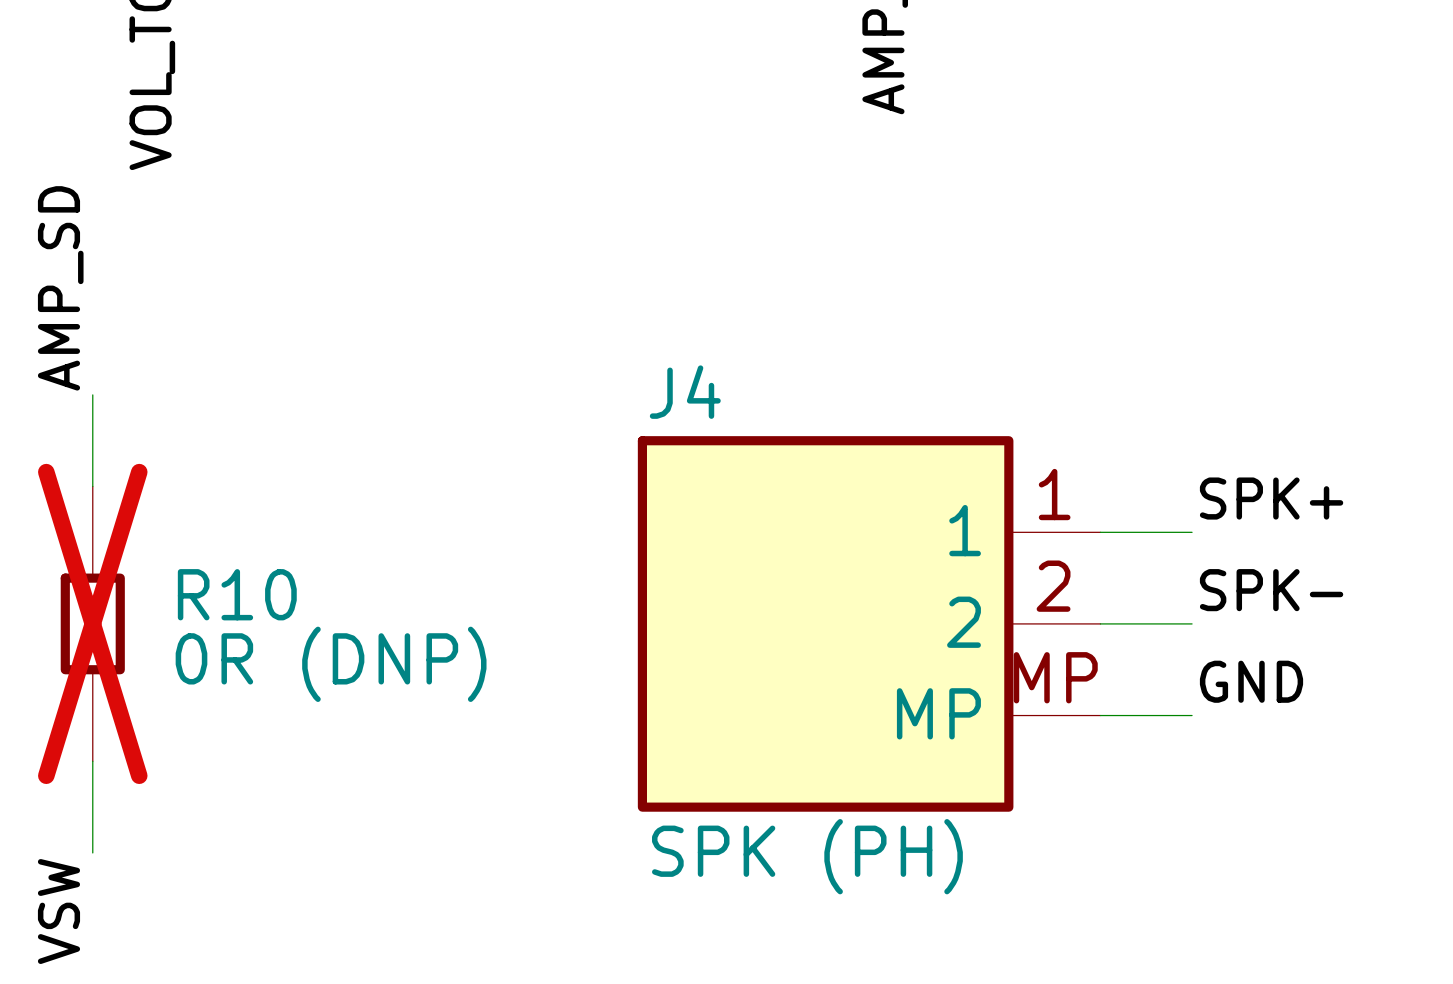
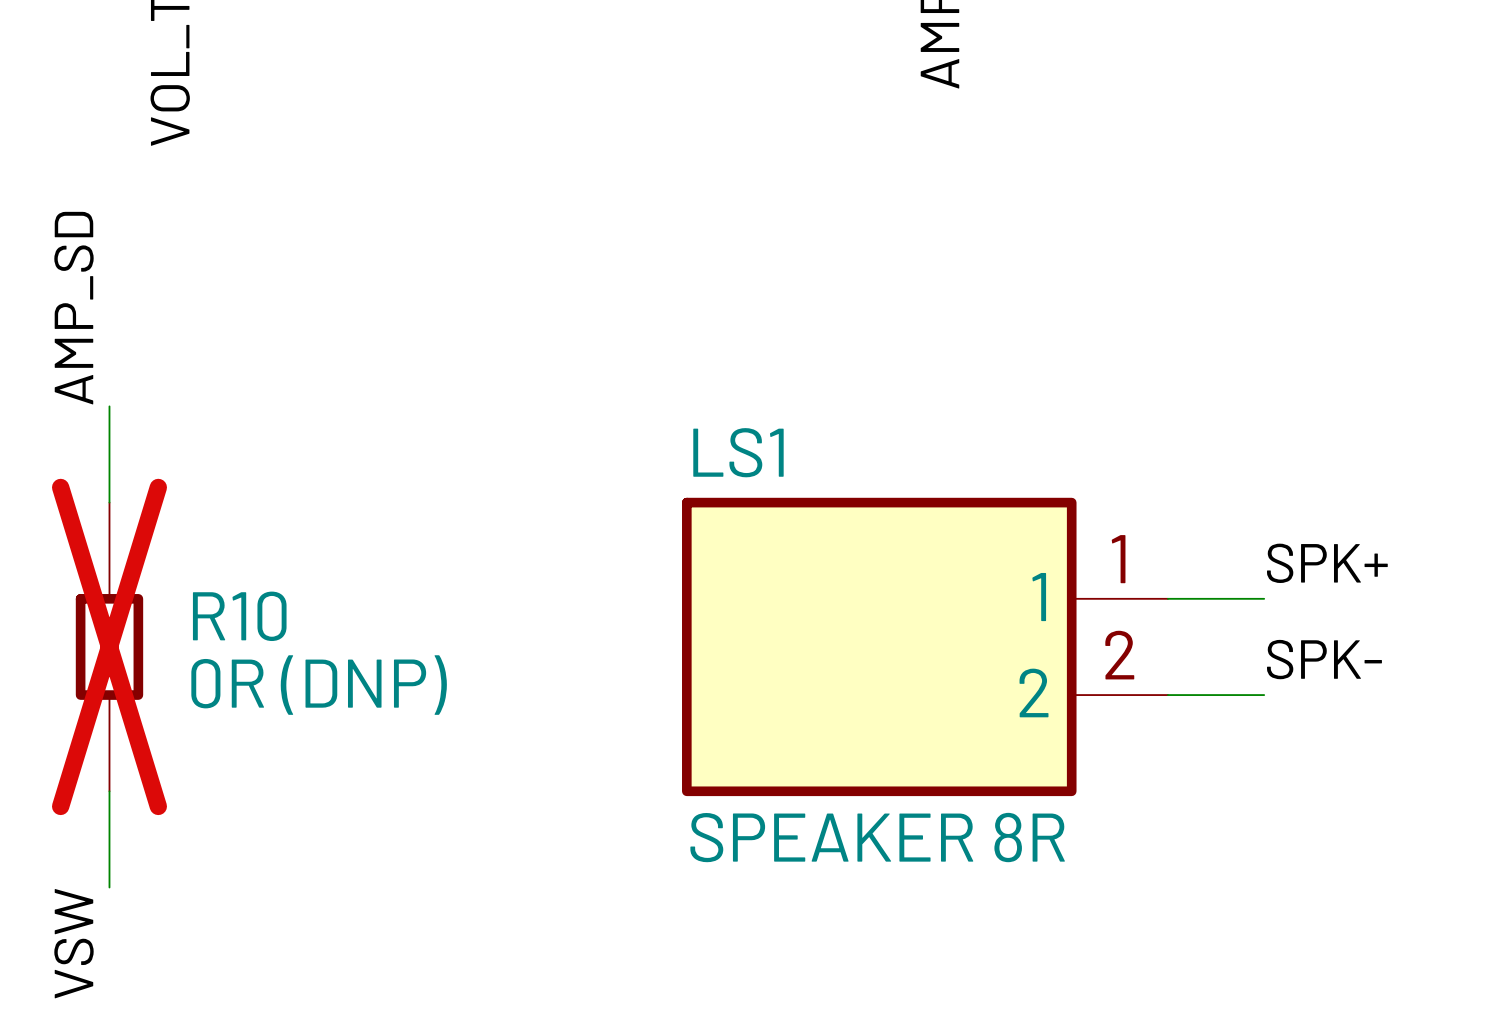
label position: SPK+ (1271, 498) -> SPK+ (1327, 563)
wire: (1100, 532) (1192, 532) -> (1167, 598) (1264, 598)
label position: SPK- (1271, 590) -> SPK- (1324, 659)
J4: SPK (PH) (869, 623) -> none
LS1: none -> SPEAKER 8R (924, 646)
wire: (1100, 623) (1192, 623) -> (1167, 695) (1264, 695)
label: GND (1251, 681) -> none
wire: (1100, 715) (1192, 715) -> none

